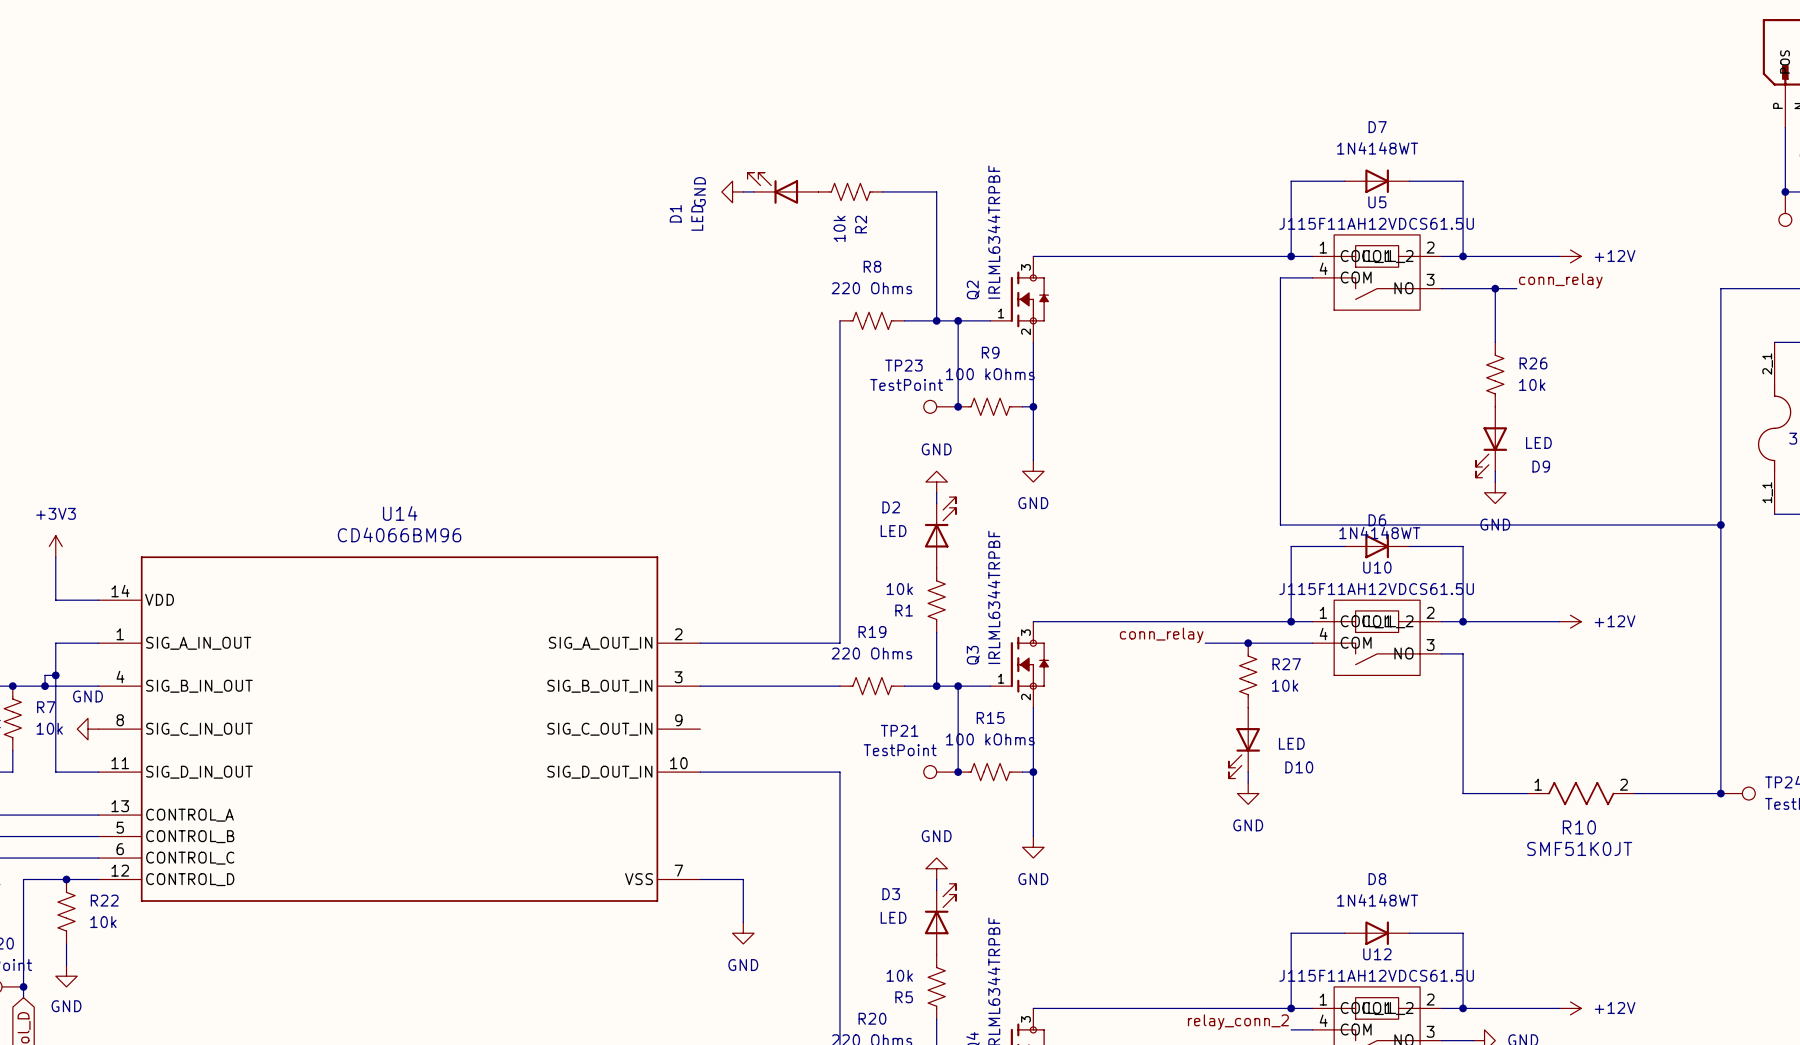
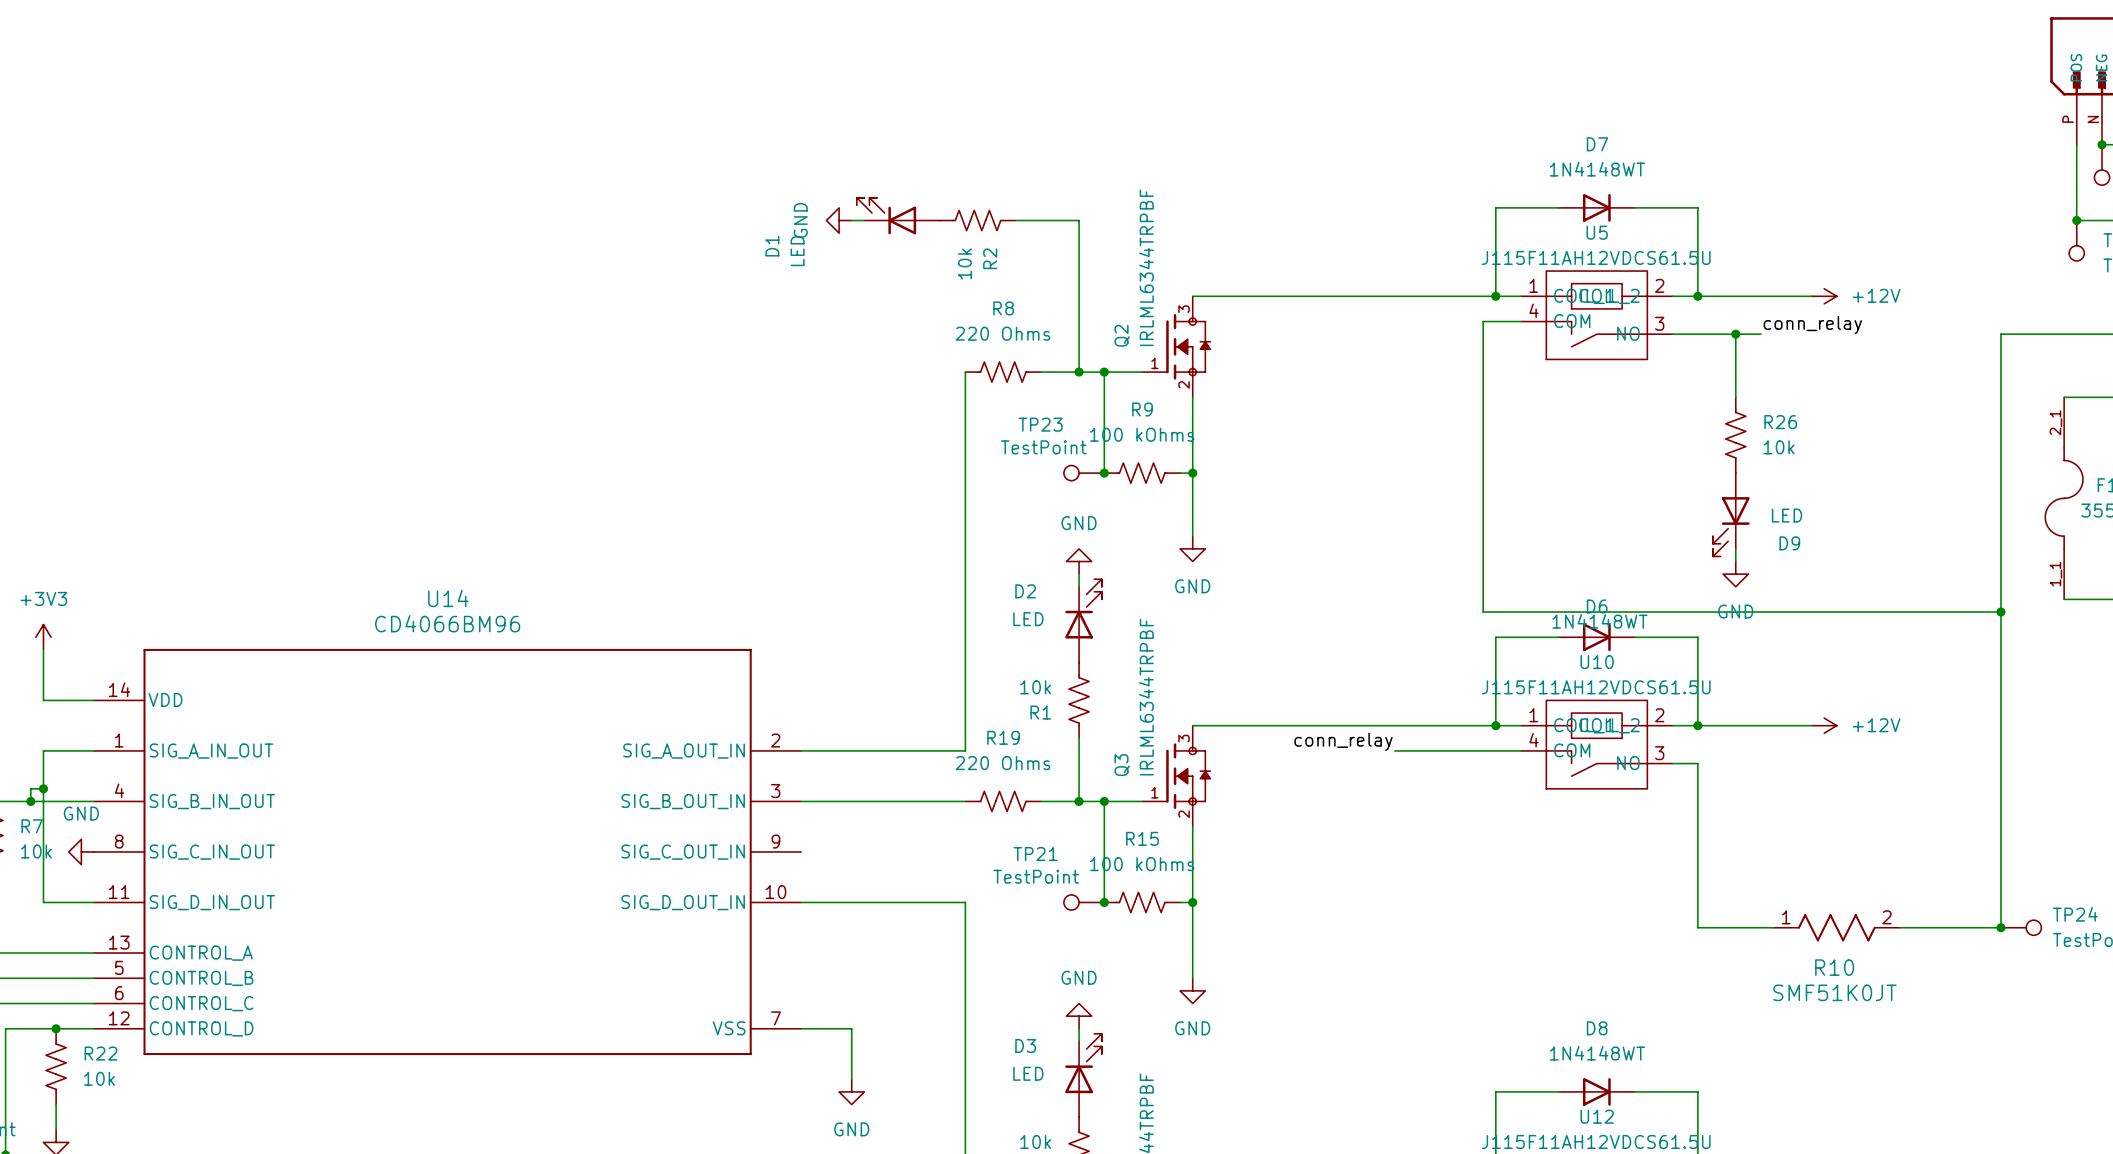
junction: (1248, 643) -> none
R27: 10k (1248, 675) -> none
D10: LED (1244, 743) -> none
wire: (1248, 772) (1248, 782) -> none
power symbol: GND (1248, 793) -> none

